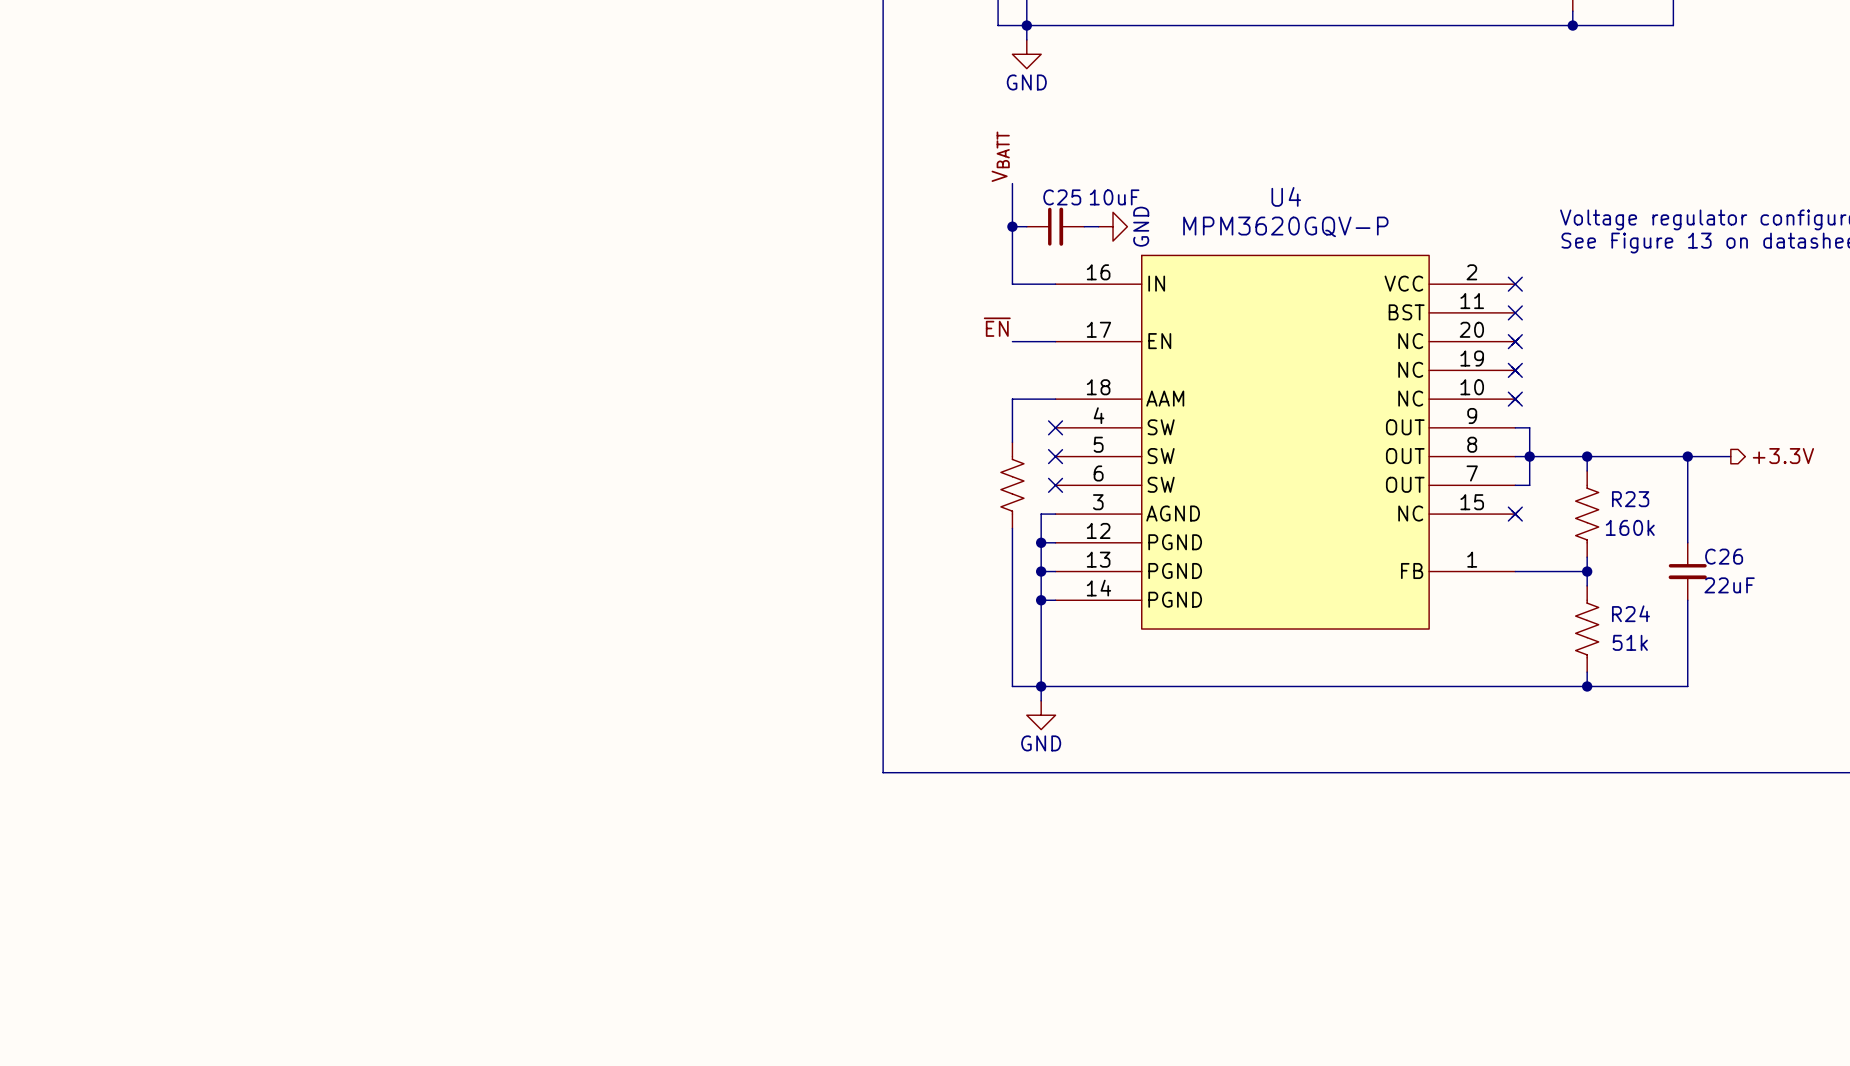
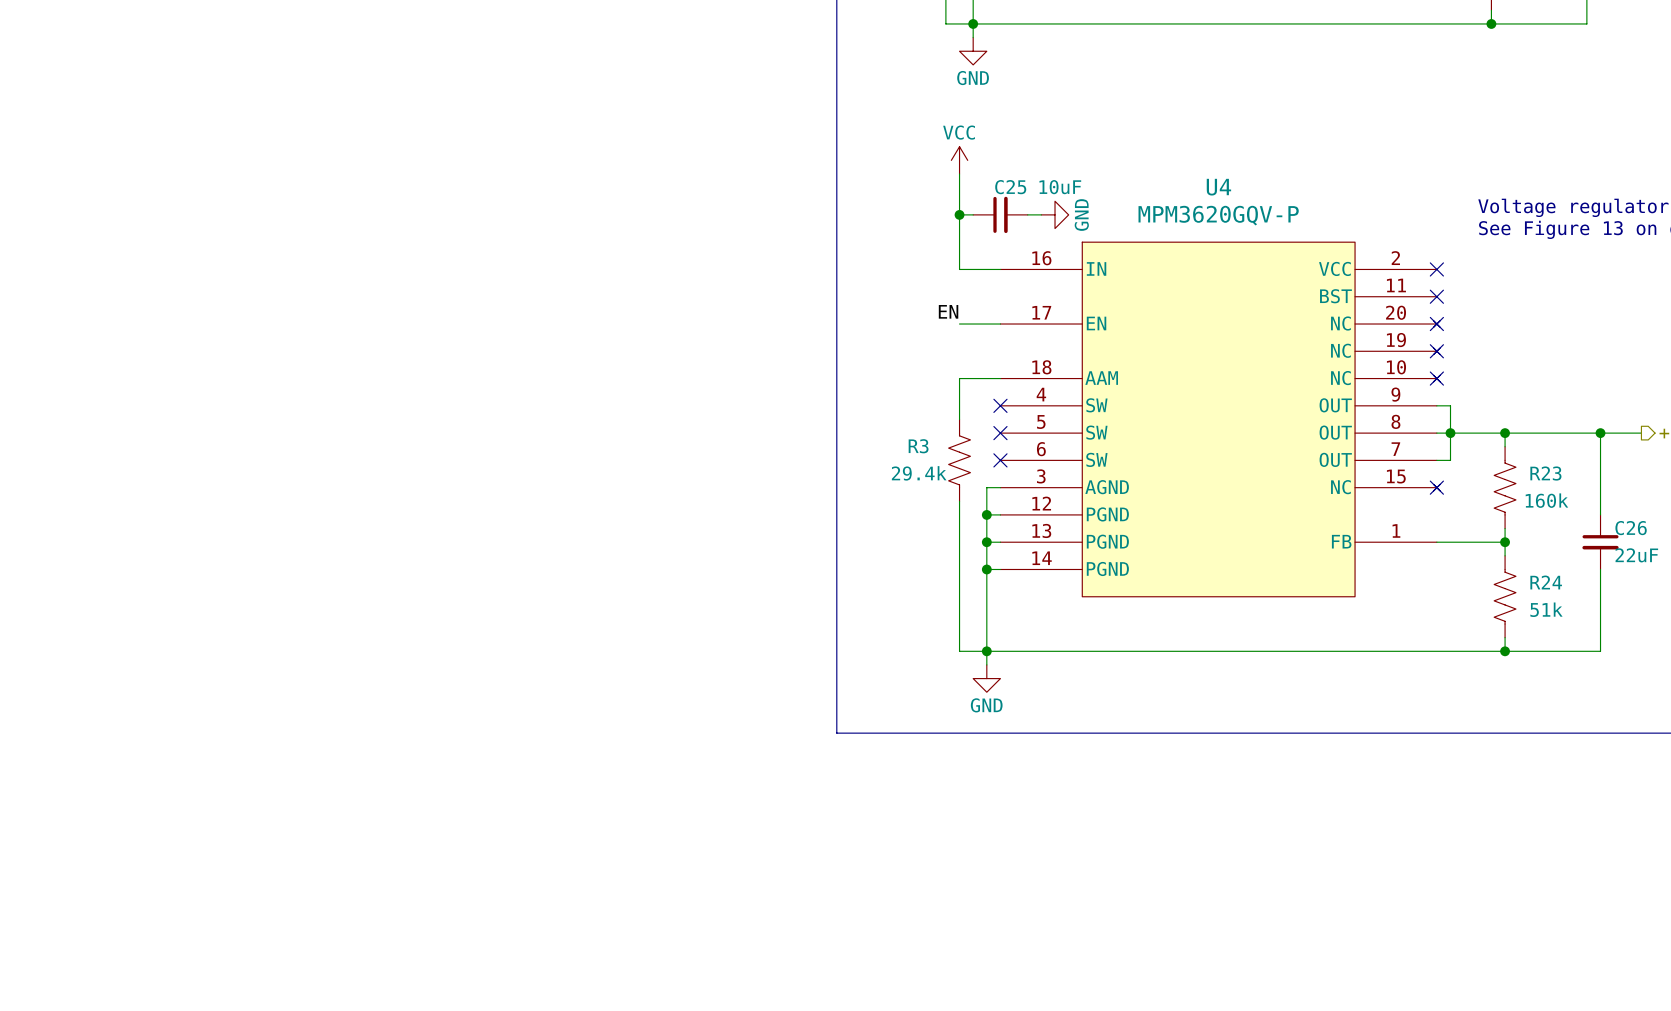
label: VBATT (1000, 156) -> none
power symbol: none -> VCC (959, 160)
label: ~{EN} (997, 327) -> EN (948, 311)
R3 name: none -> R3 (918, 446)
R3 value: none -> 29.4k (919, 473)

